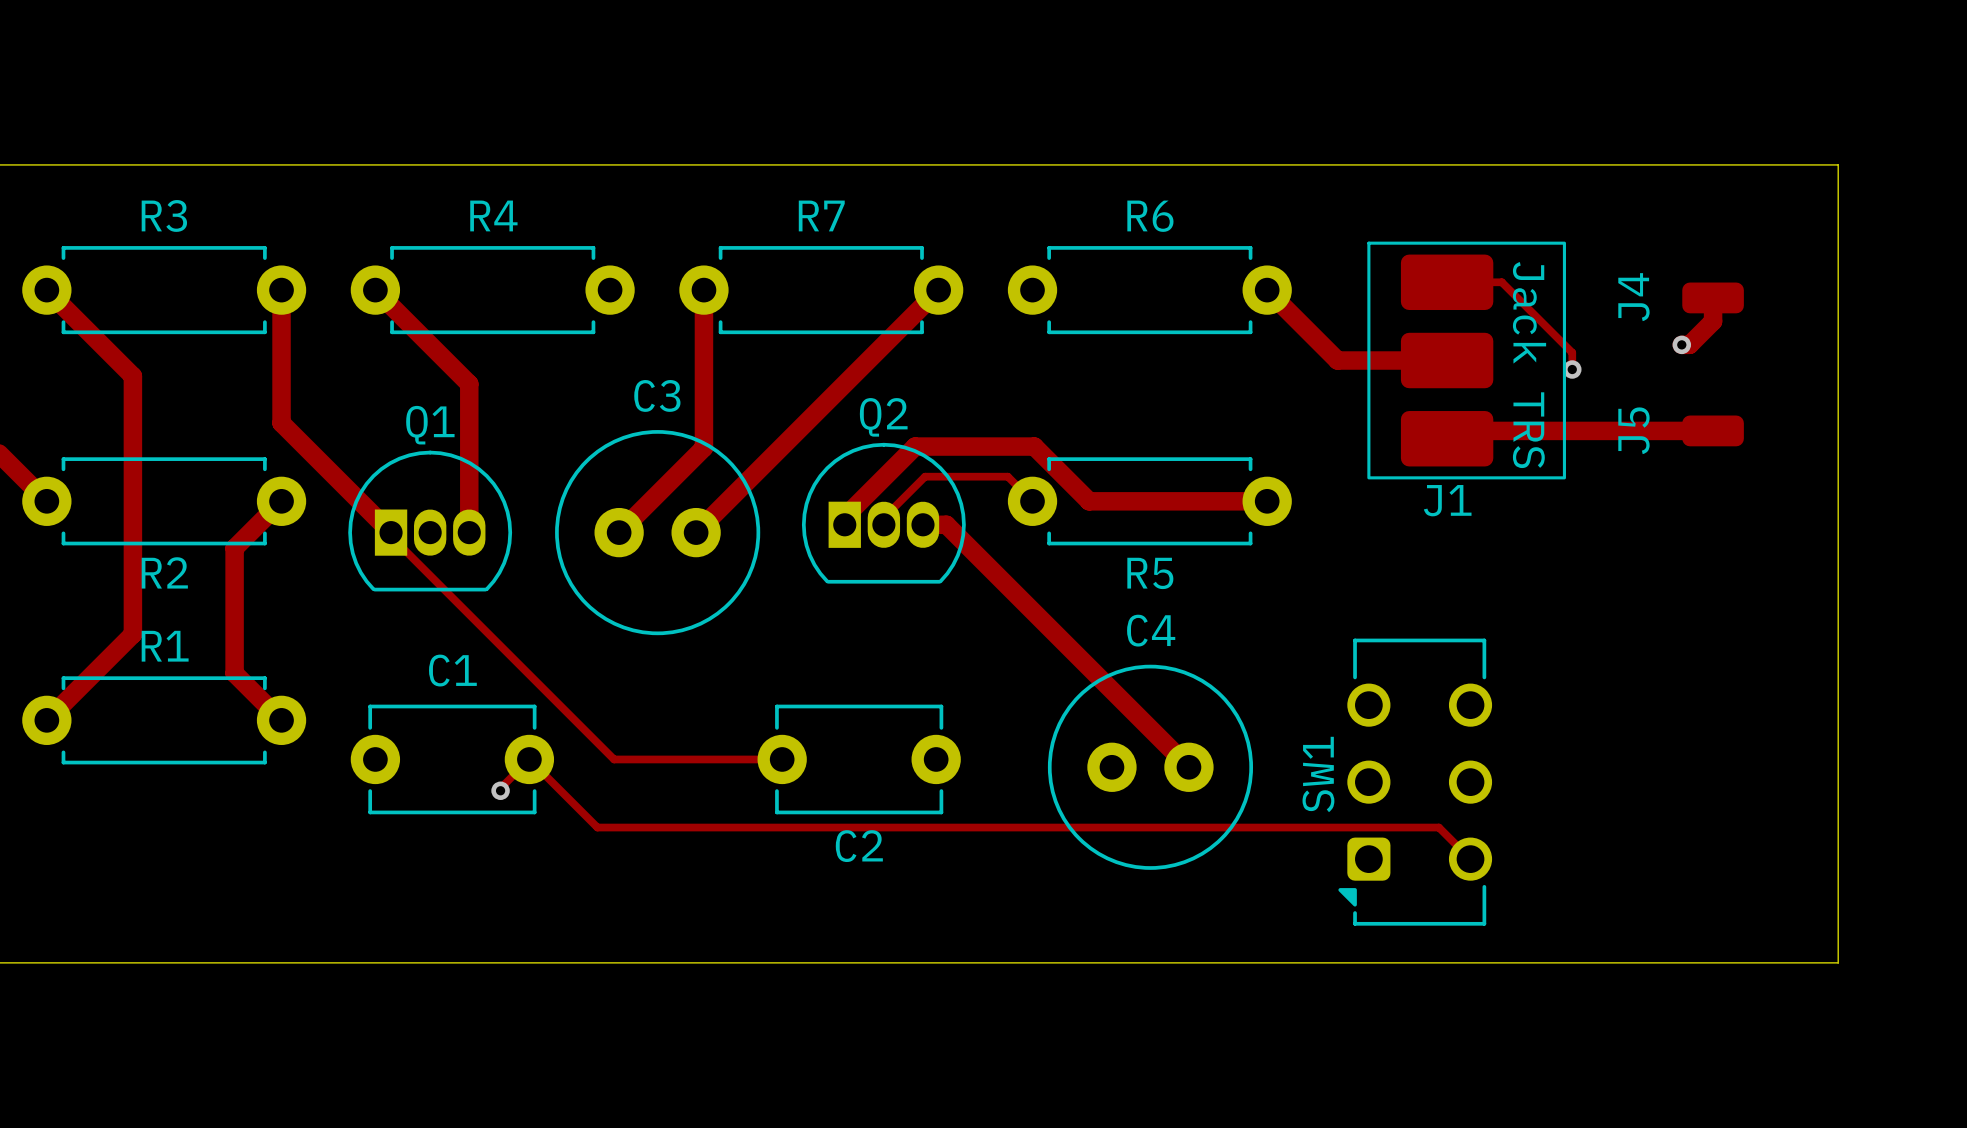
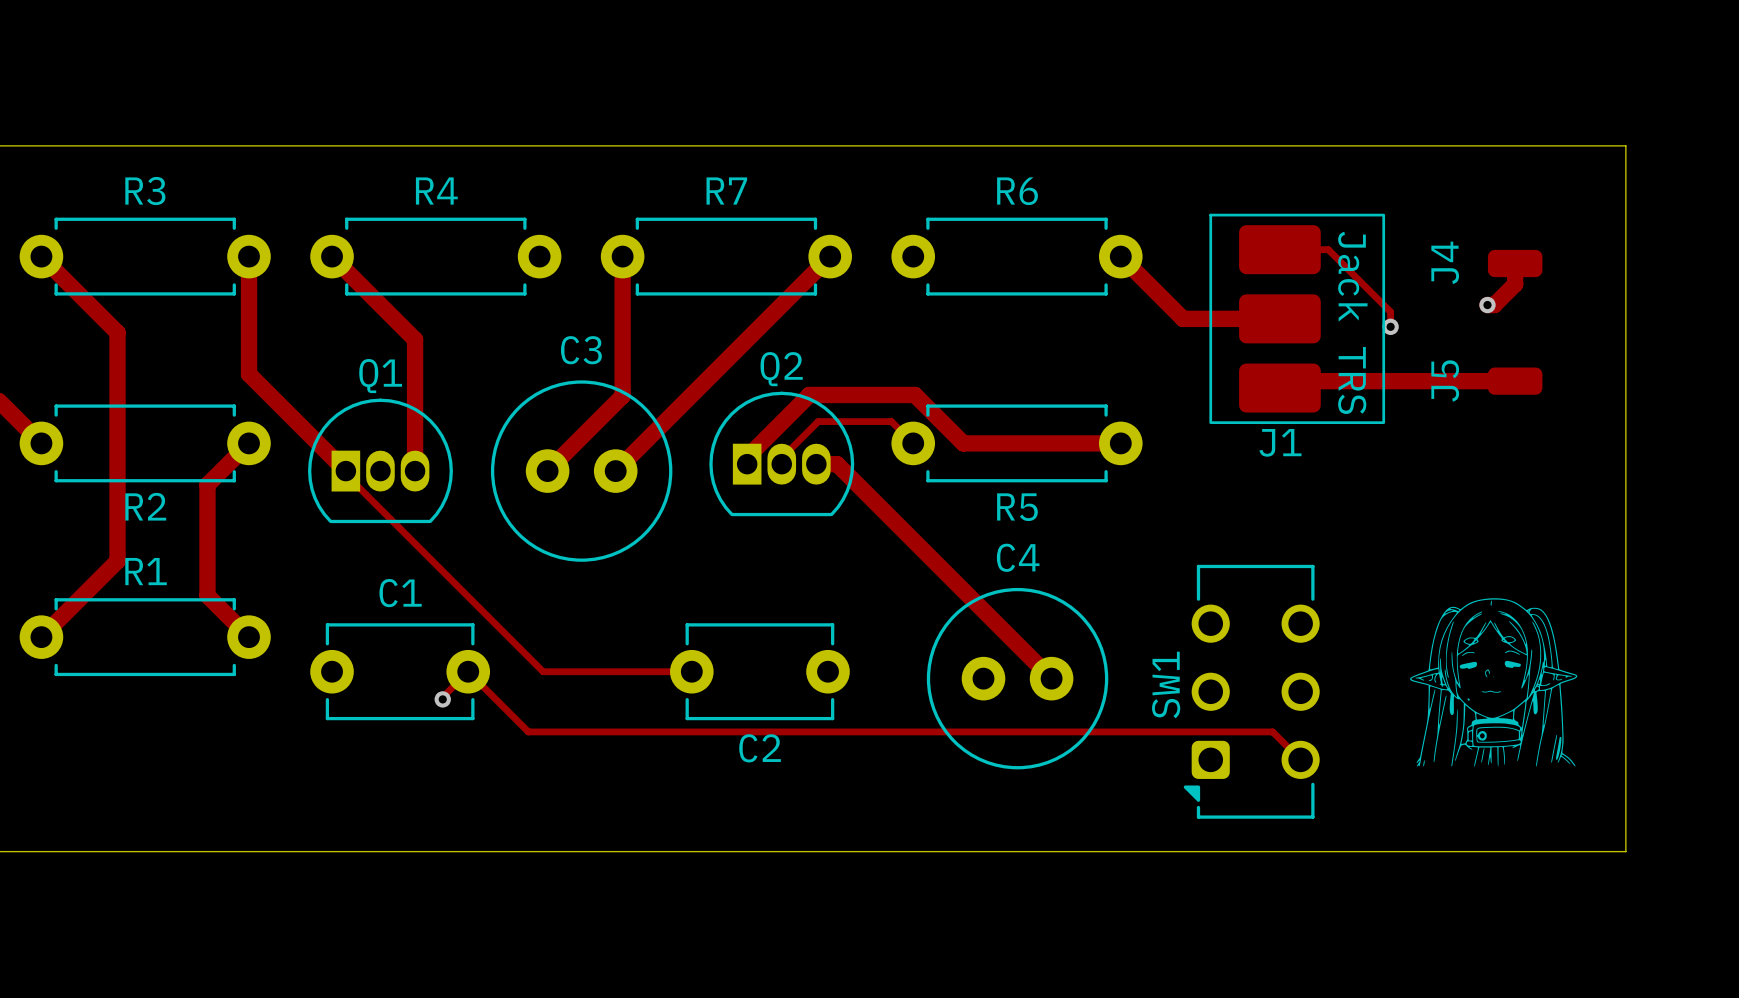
drawing: none -> [1410, 598, 1578, 767]

